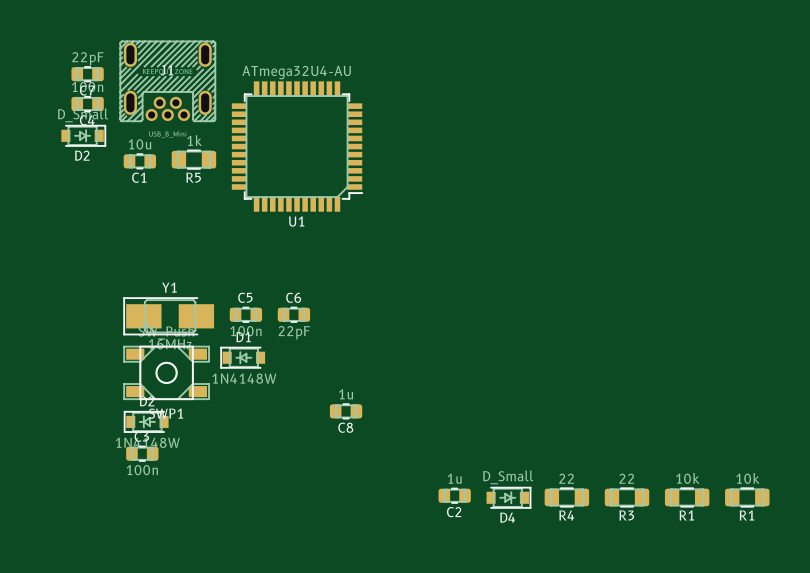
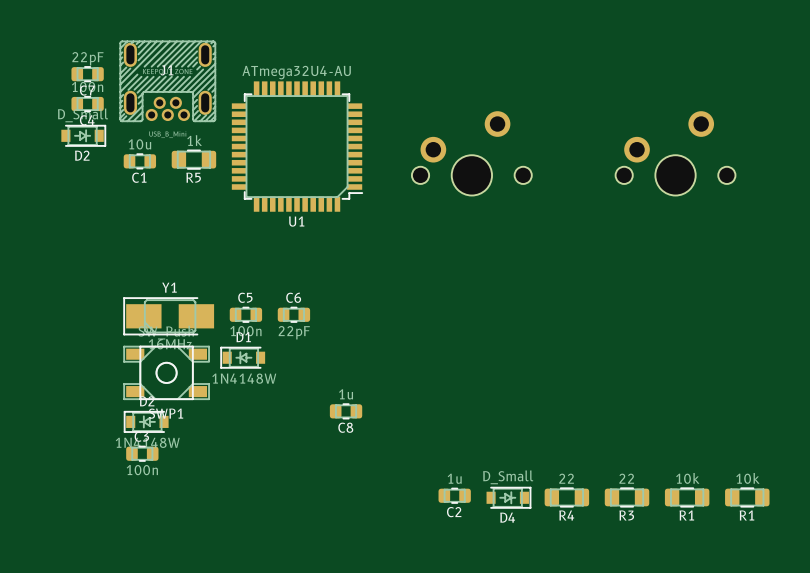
part: none -> (471, 153)
part: none -> (675, 153)

